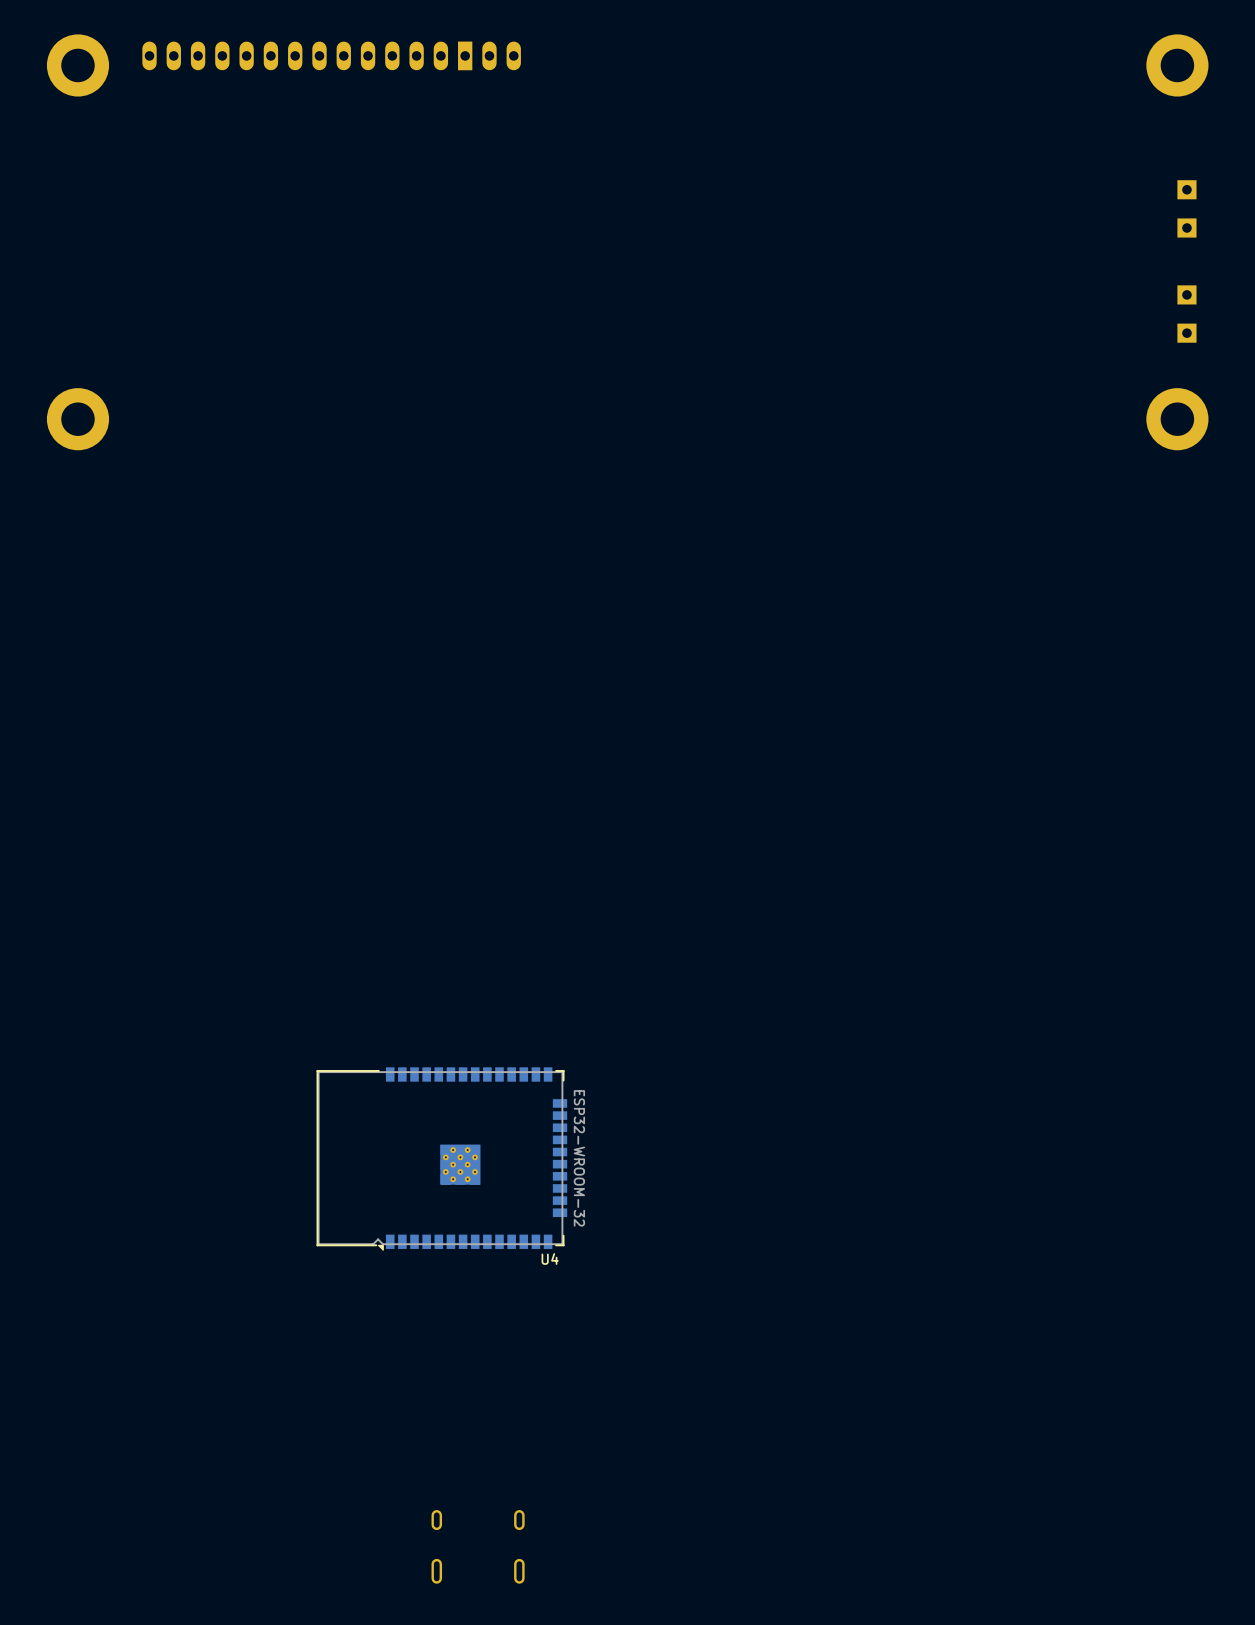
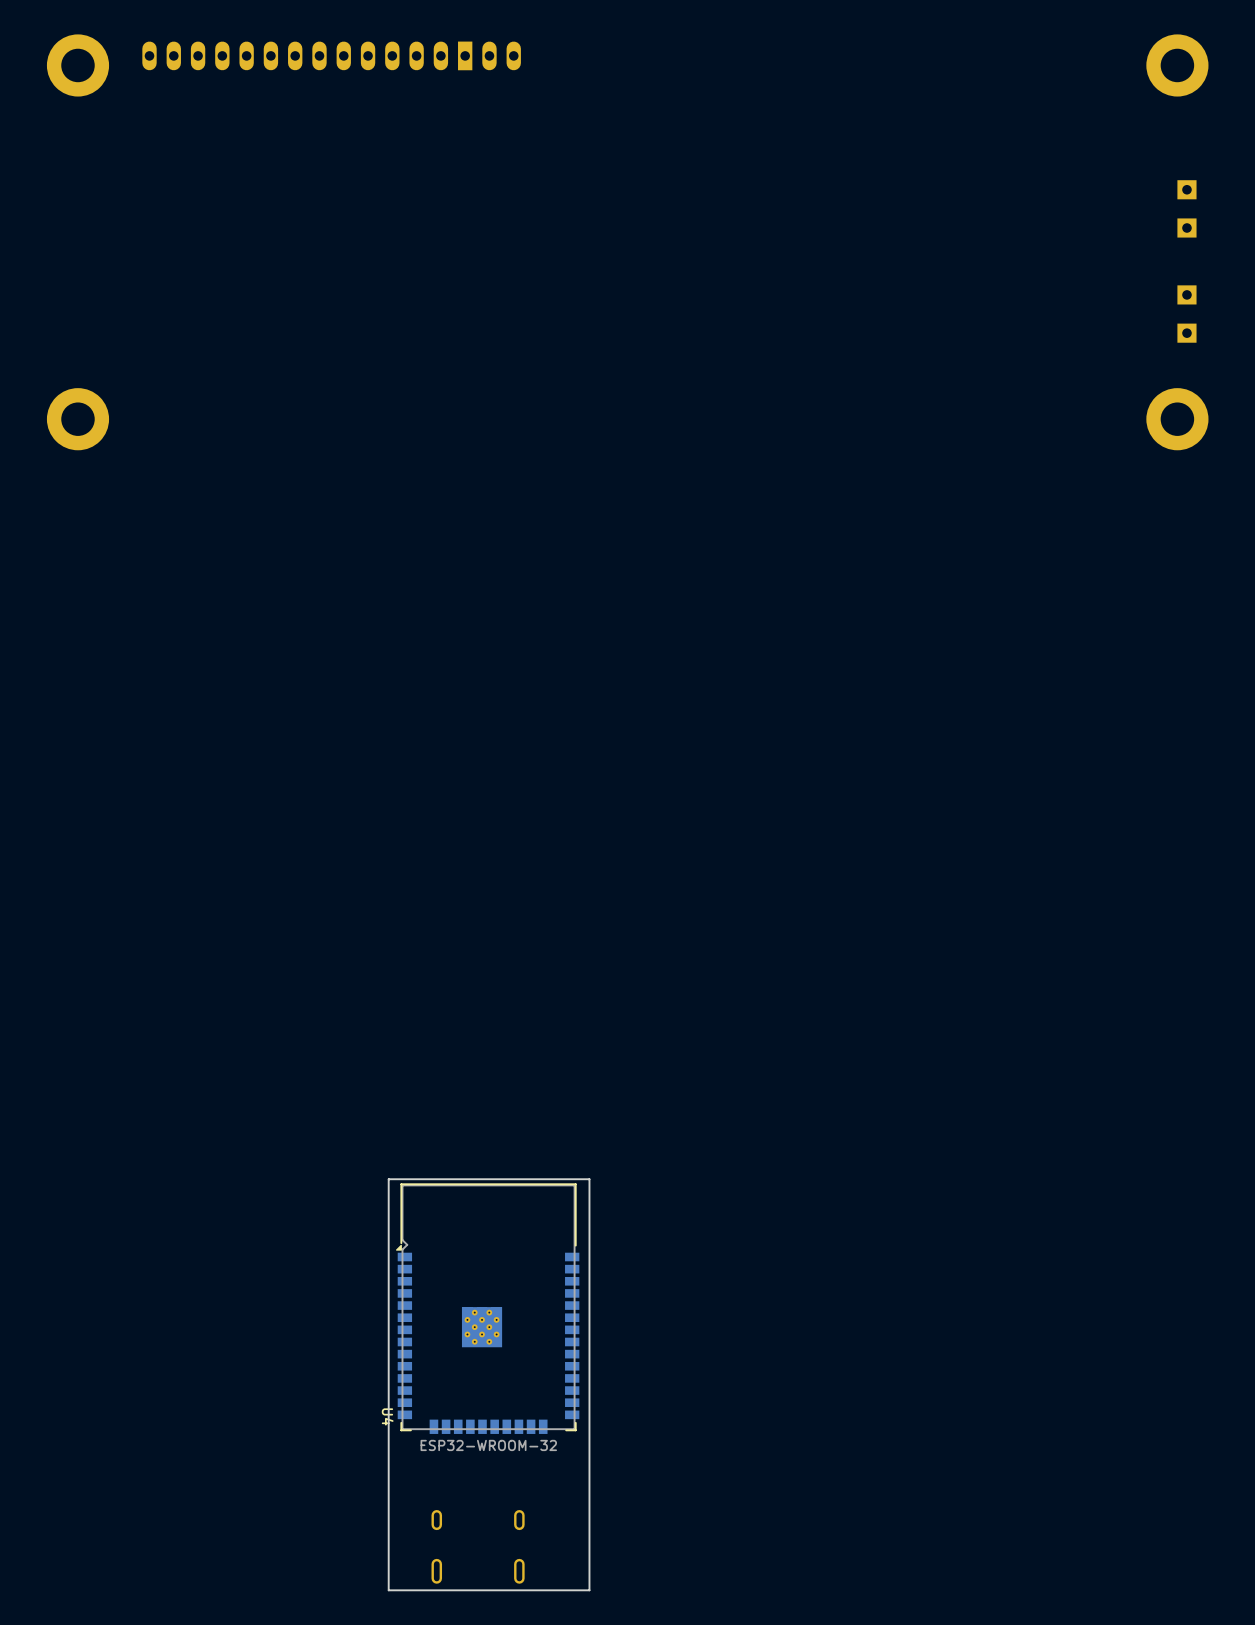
U4 rotation: 0° (442, 1159) -> 90° clockwise (487, 1308)
U4 position: (442, 1159) -> (487, 1308)
board edge: none -> (589, 1179) (388, 1179) (388, 1590) (589, 1590) (589, 1179)

